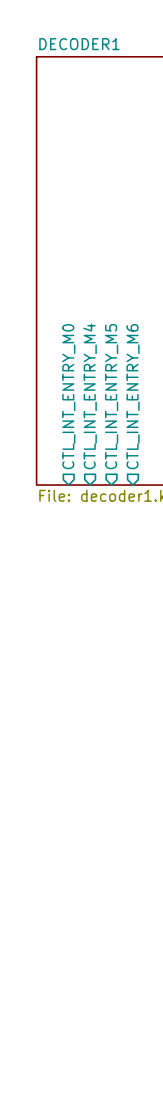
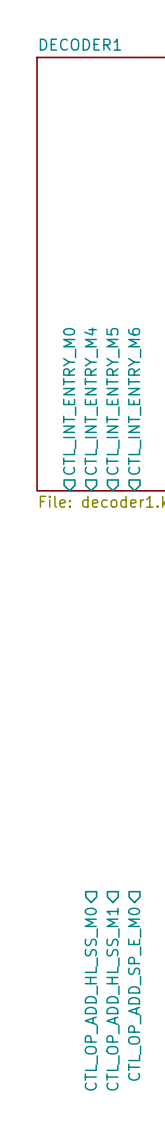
sheet pin: none -> CTL_OP_ADD_SP_E_M0 (134, 994)
sheet pin: none -> CTL_OP_ADD_HL_SS_M0 (91, 999)
sheet pin: none -> CTL_OP_ADD_HL_SS_M1 (112, 999)

